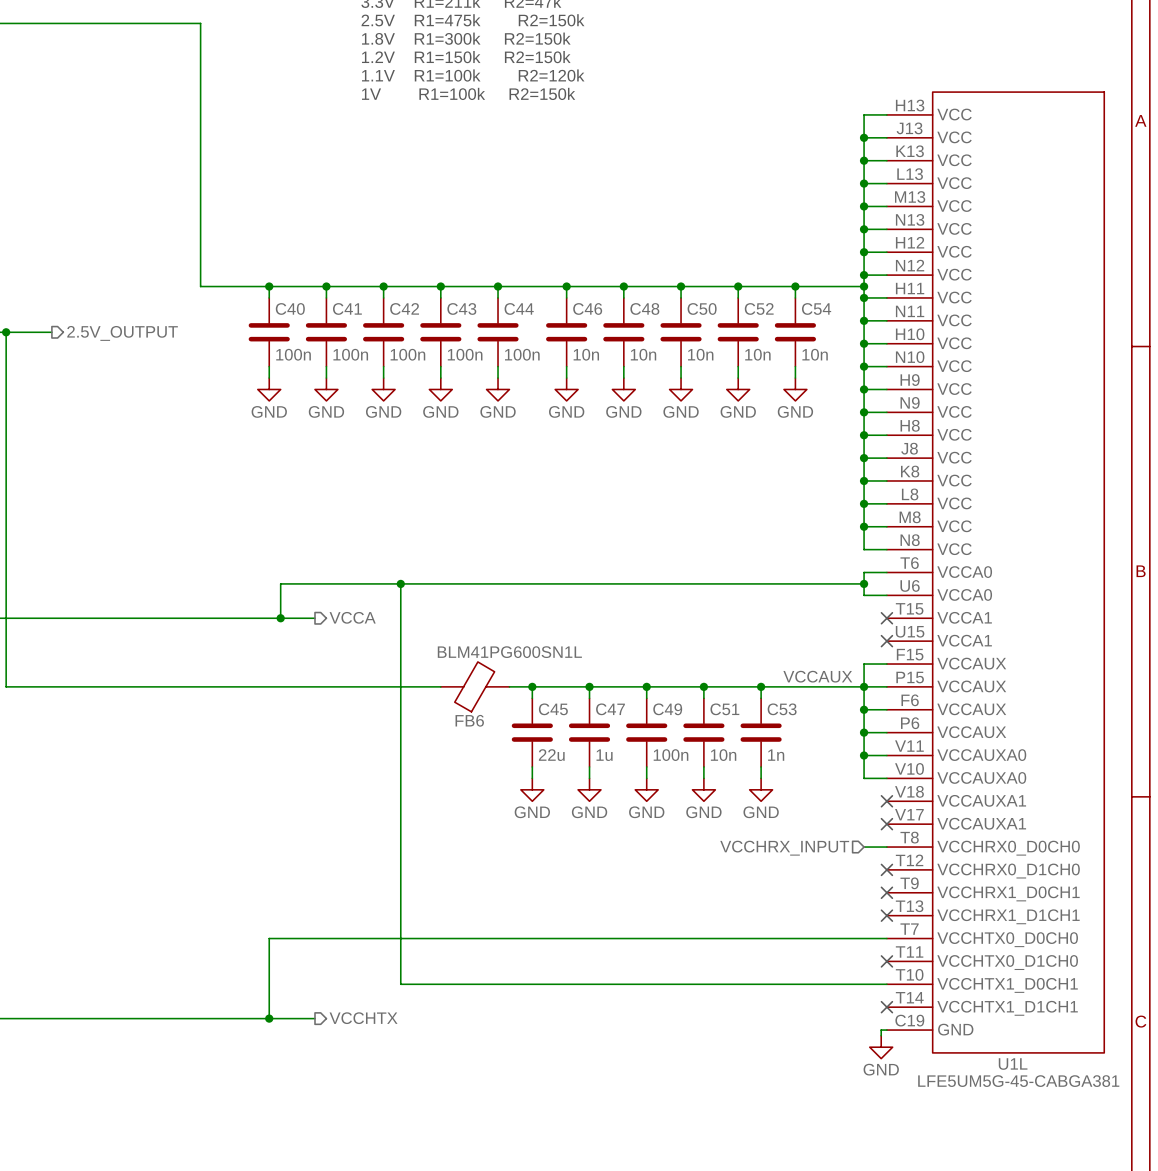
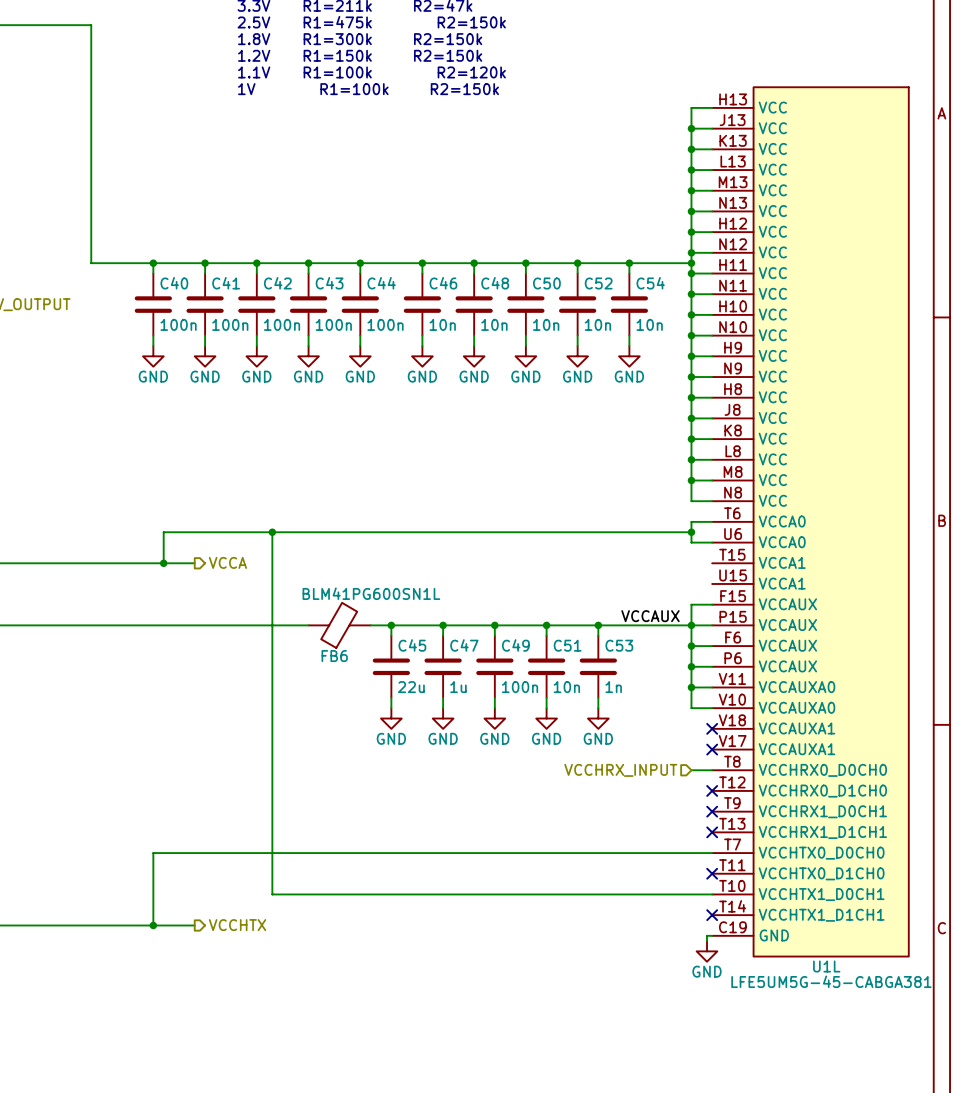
no-connect mark: (886, 618) -> none
no-connect mark: (886, 641) -> none

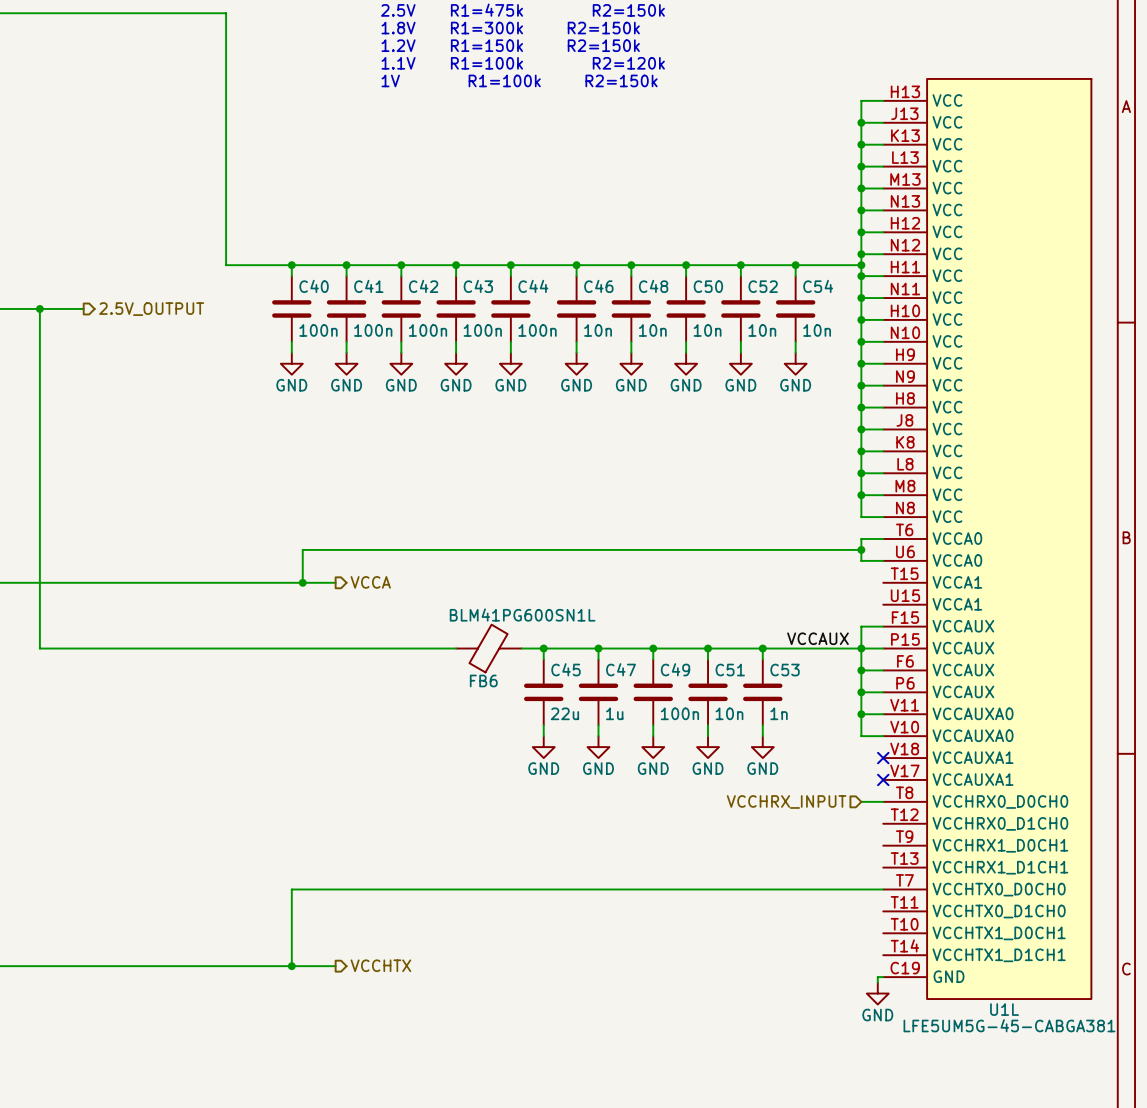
wire: (272, 532) (272, 894) (712, 894) -> none
junction: (272, 532) -> none
no-connect mark: (712, 790) -> none
no-connect mark: (712, 811) -> none
no-connect mark: (712, 832) -> none
no-connect mark: (712, 873) -> none
no-connect mark: (712, 915) -> none

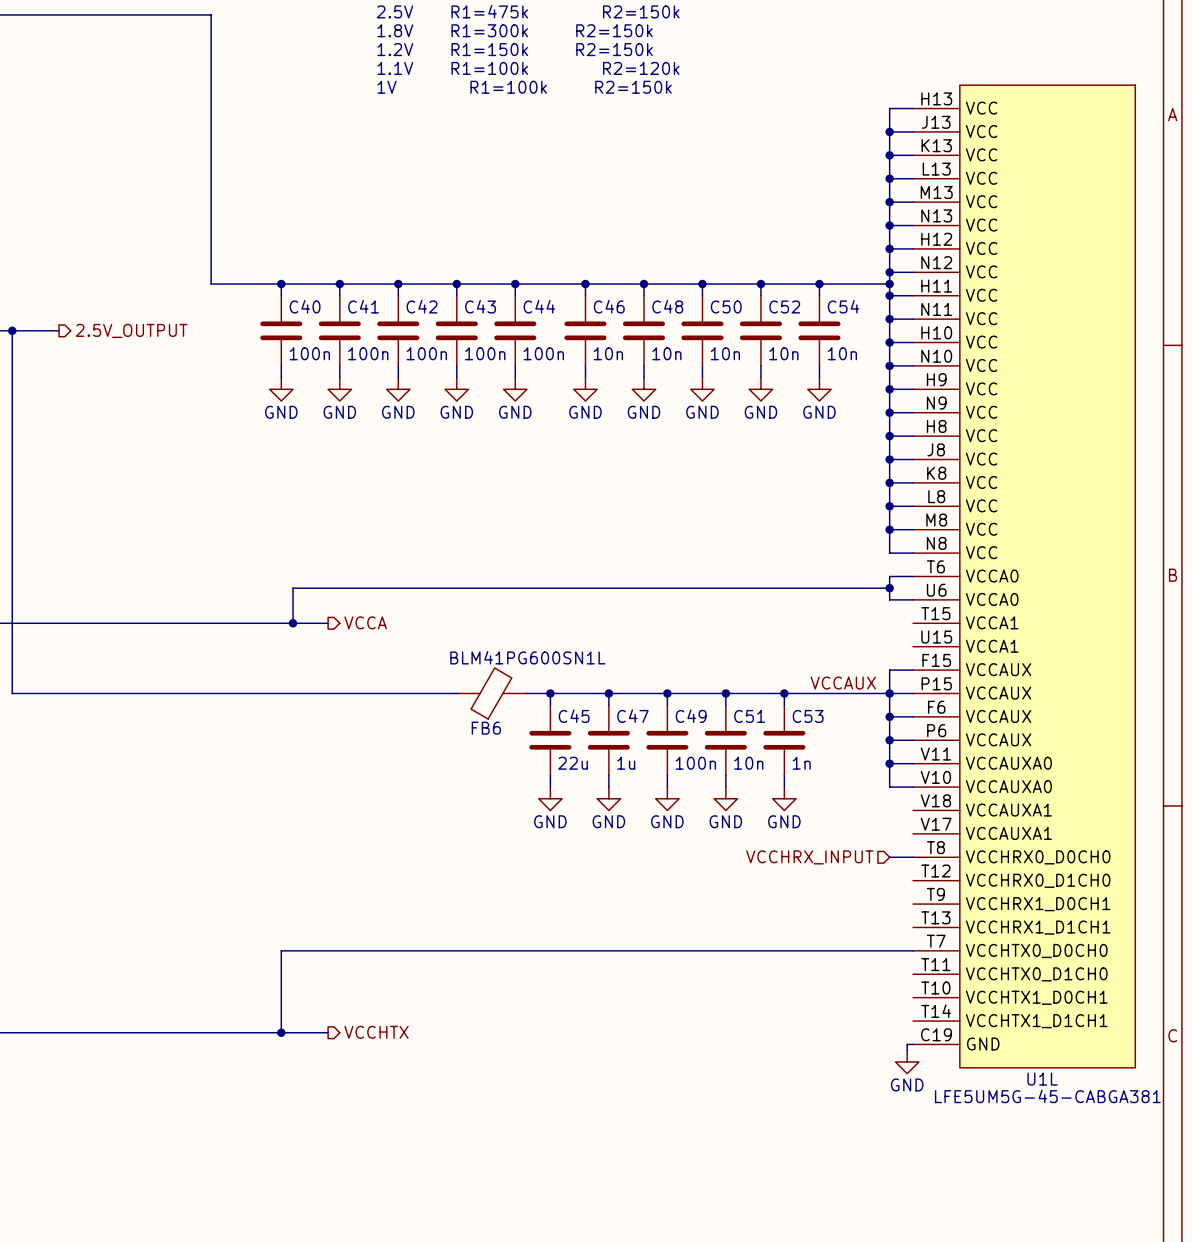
no-connect mark: (883, 758) -> none
no-connect mark: (883, 779) -> none

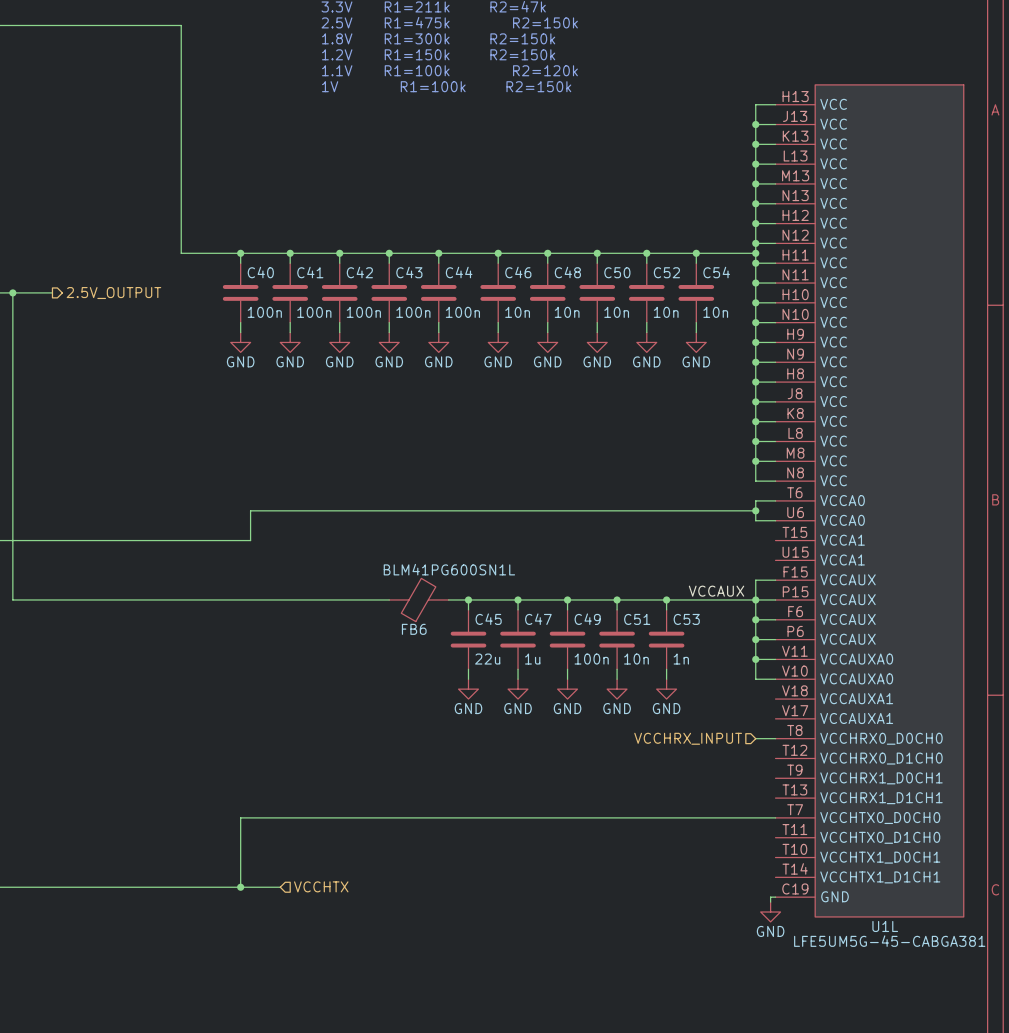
hierarchical label: VCCA (365, 622) -> none
wire: (293, 623) (328, 623) -> none
junction: (293, 623) -> none
hierarchical label shape: output (376, 1032) -> input (321, 886)

